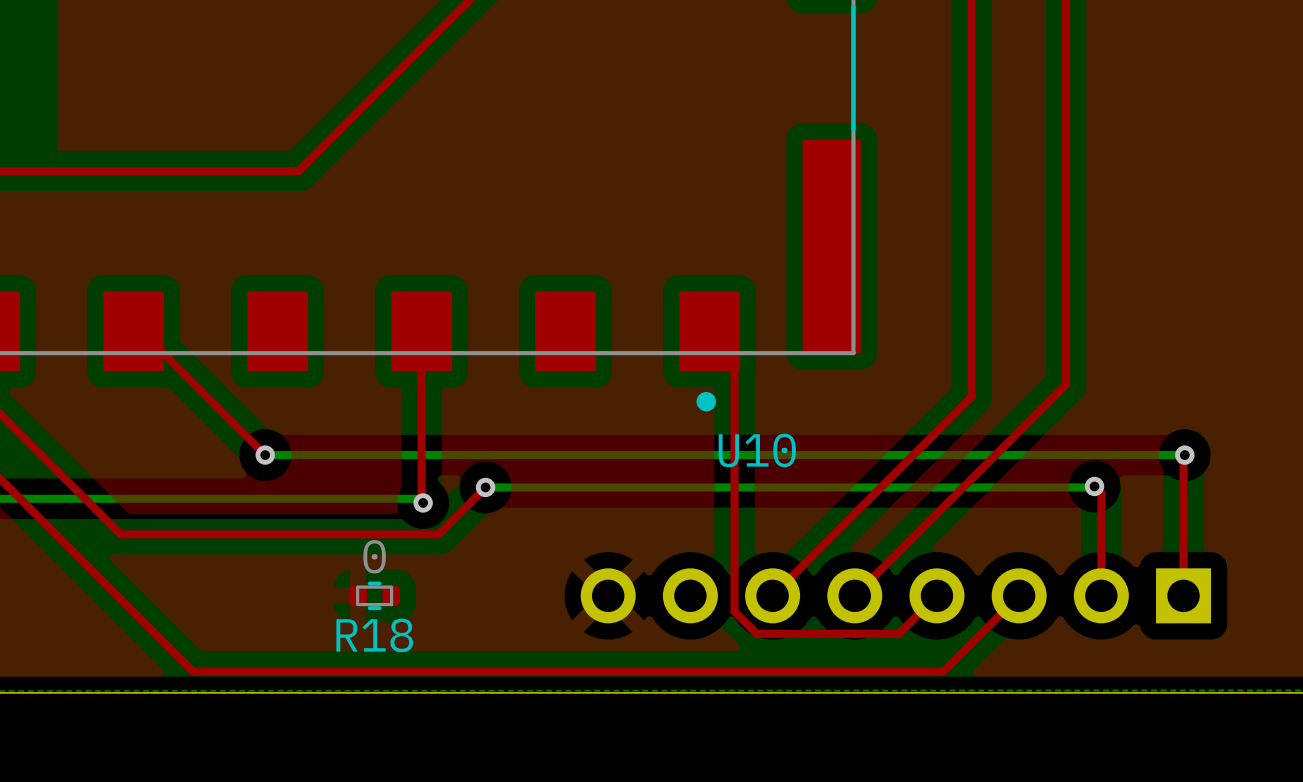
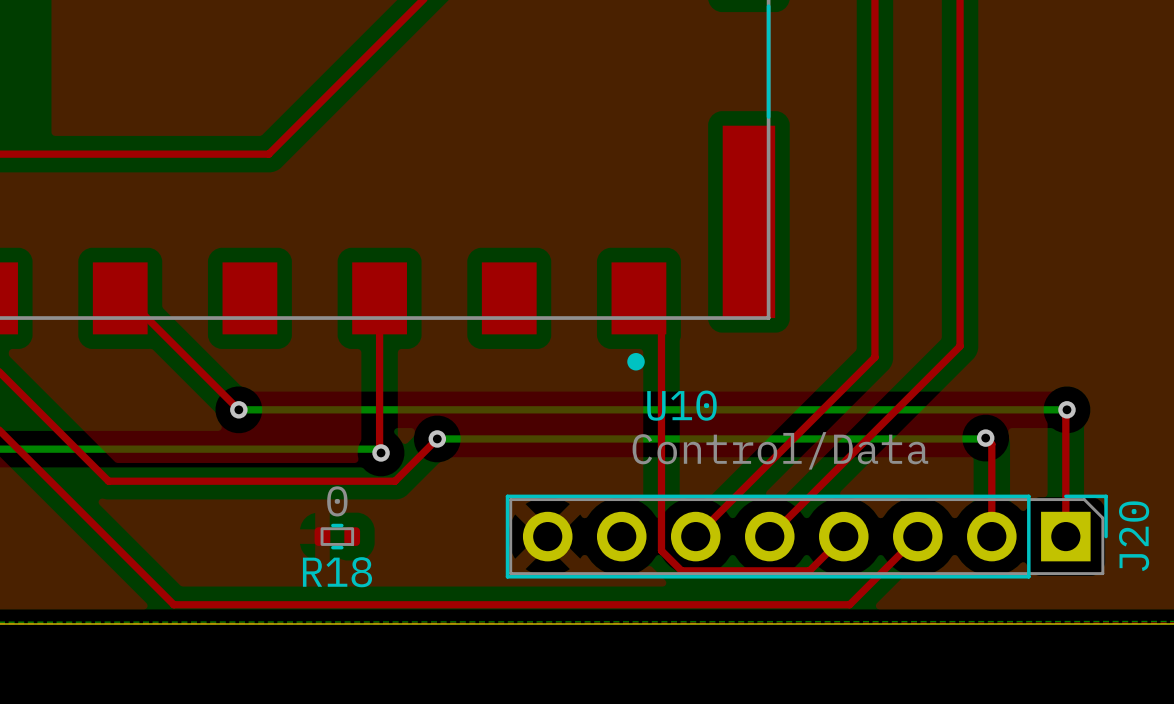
J20: none -> Control/Data (806, 536)

